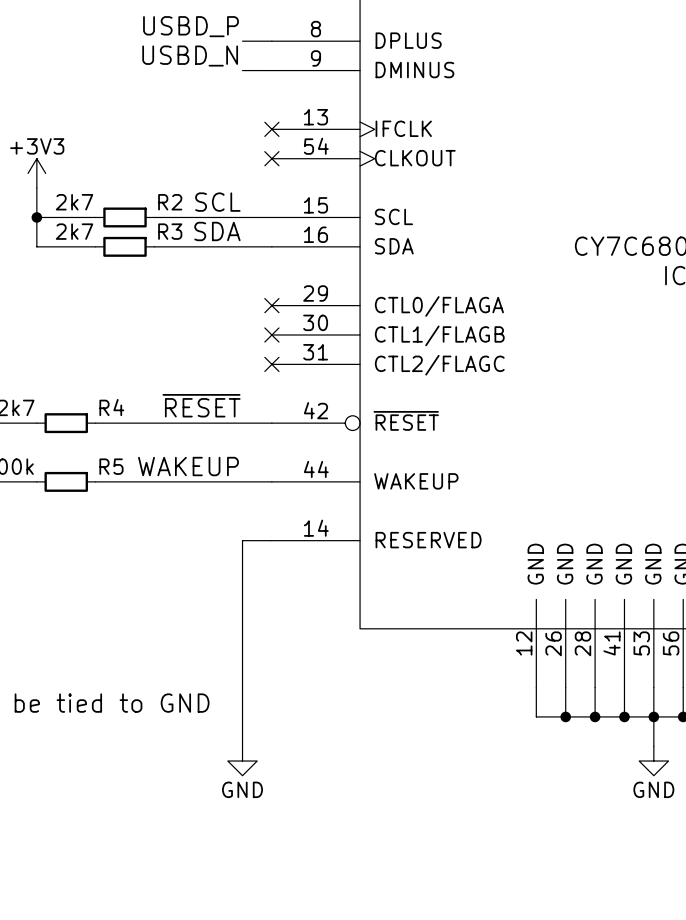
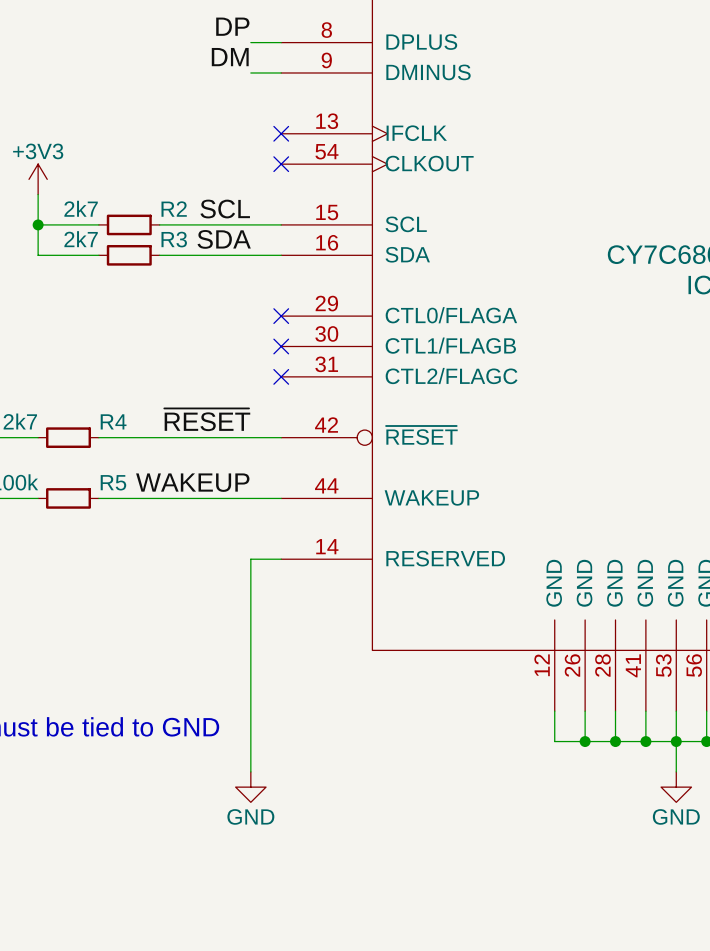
label: USBD_P (190, 26) -> DP (232, 26)
label: USBD_N (190, 56) -> DM (230, 57)

